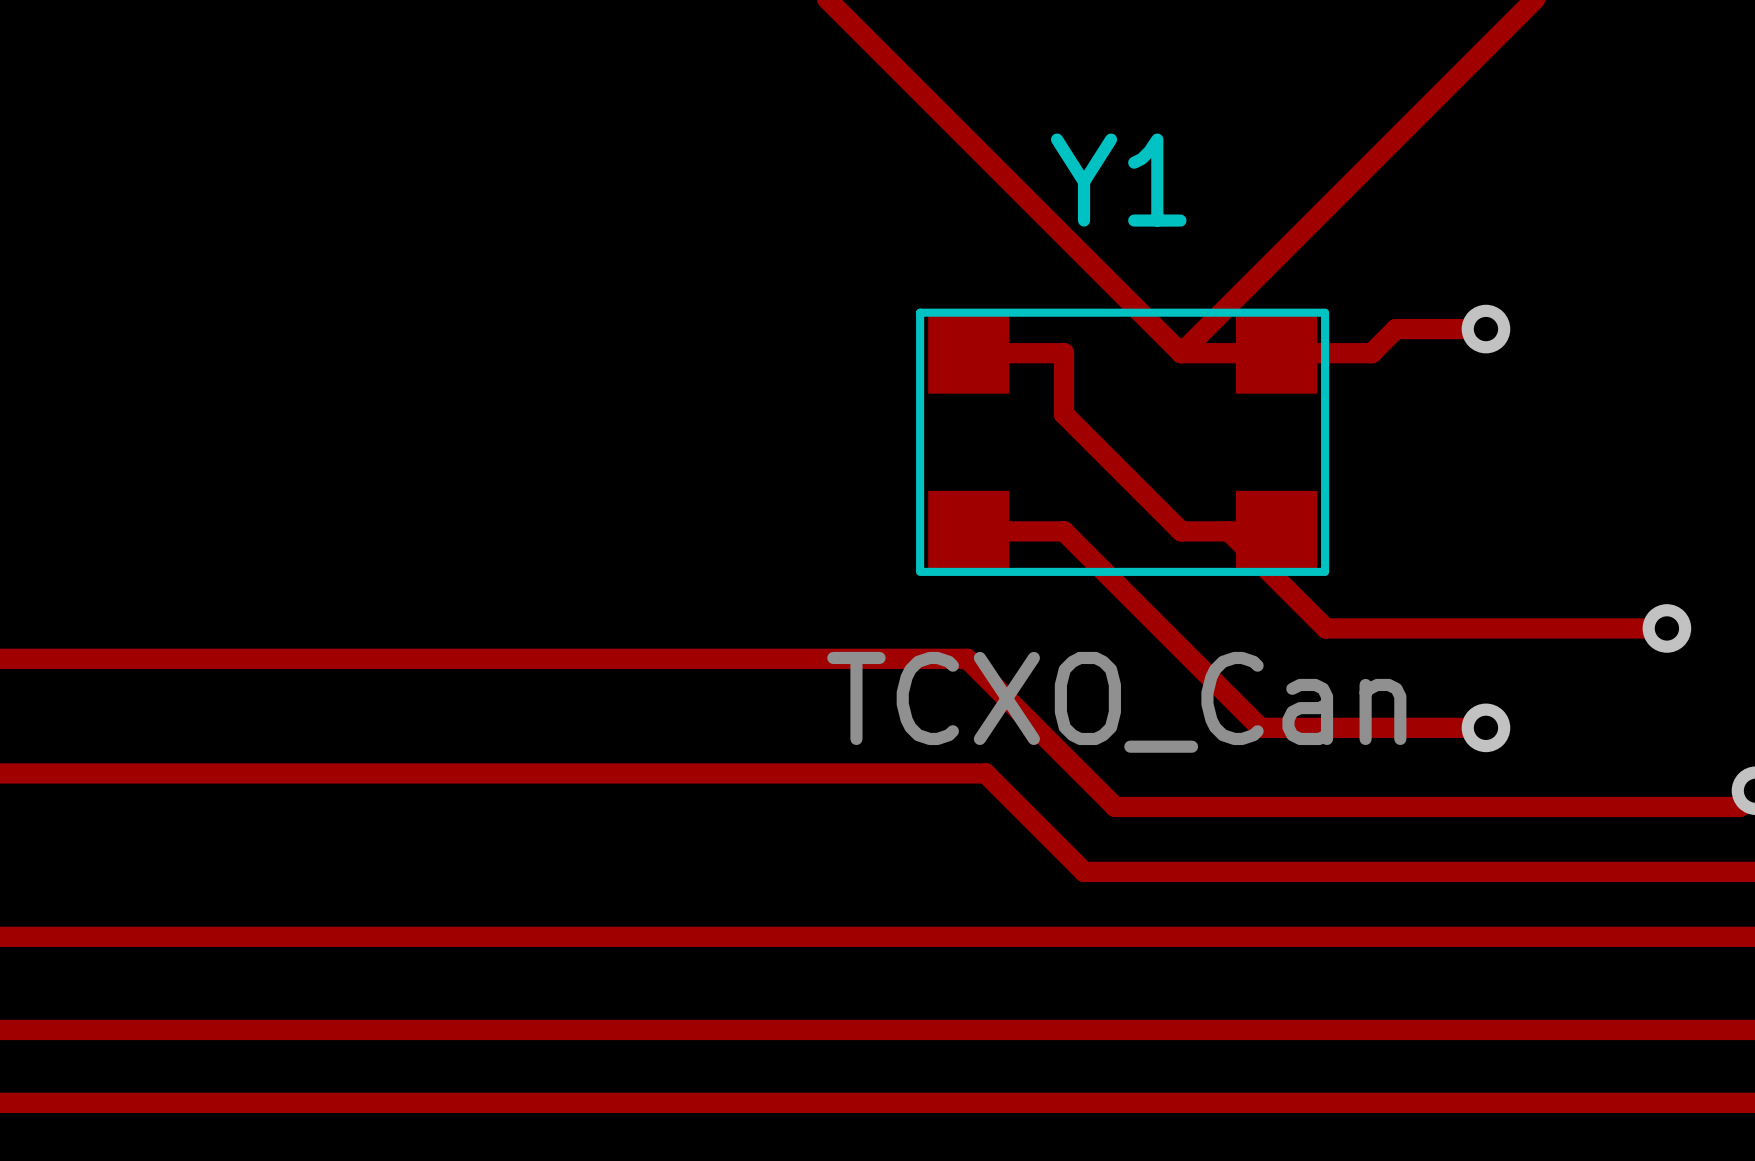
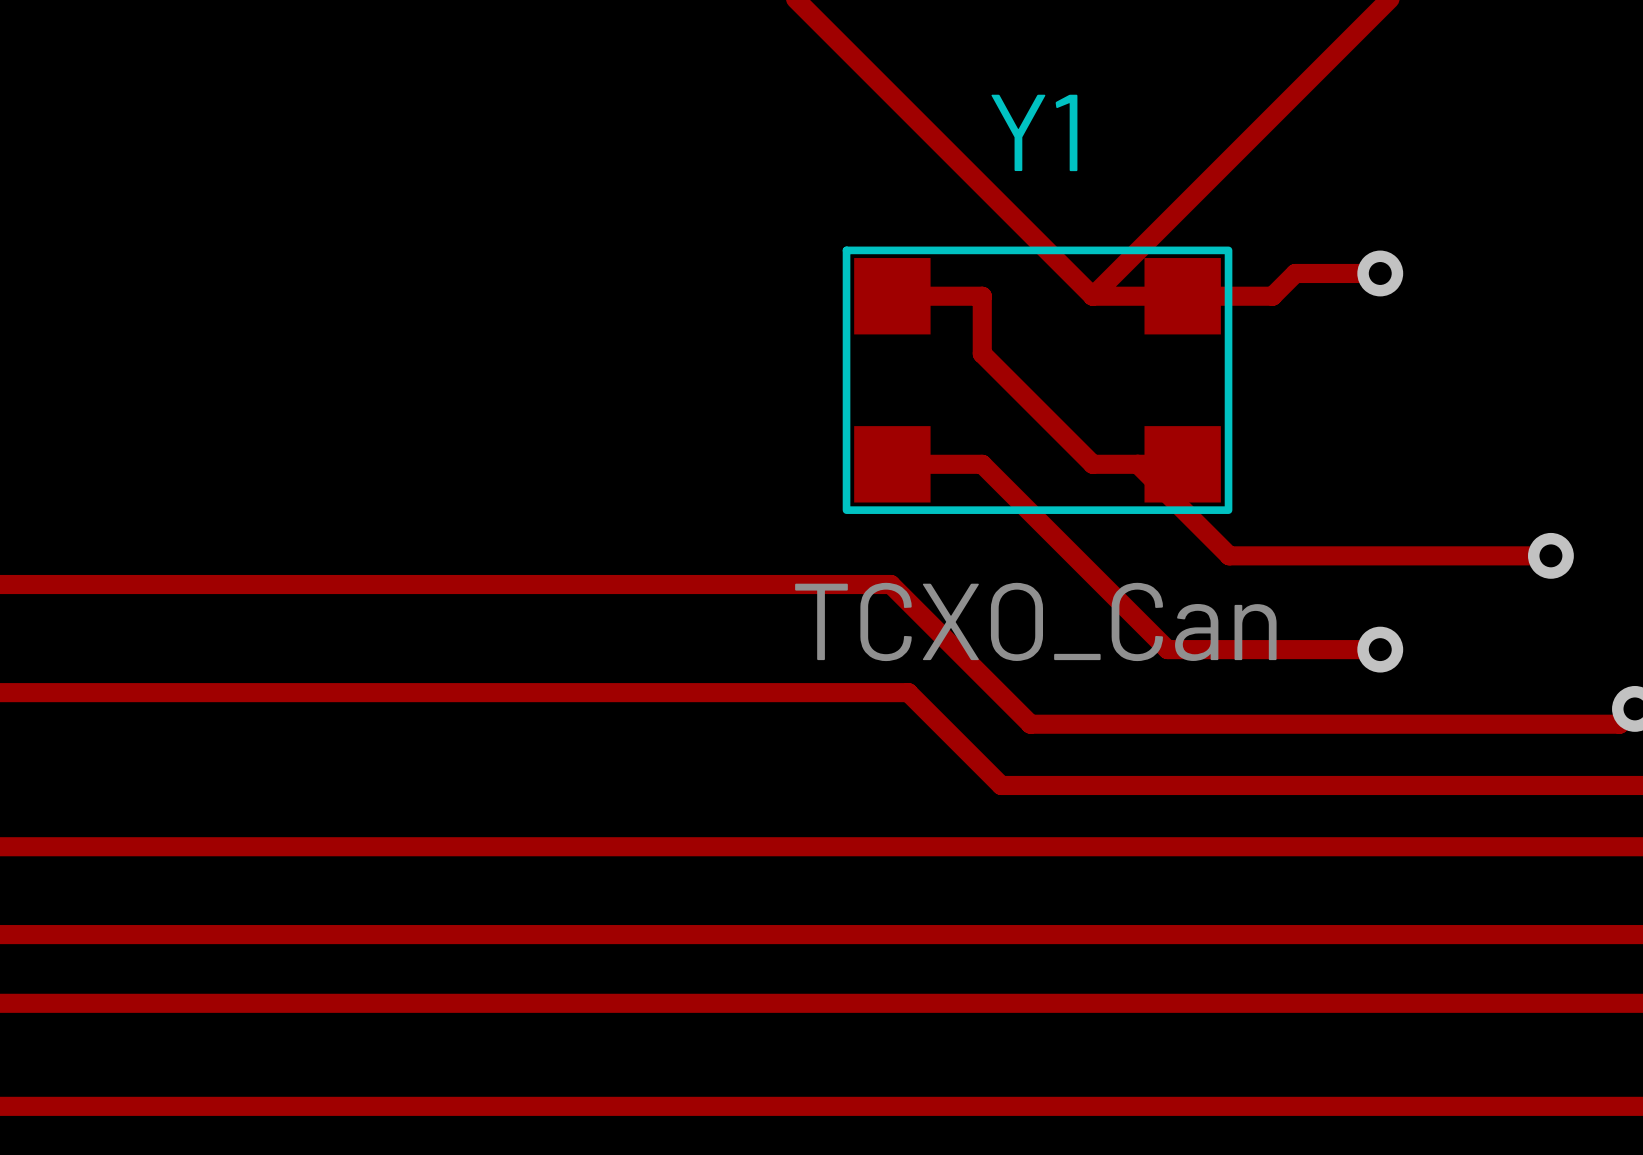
Y1 footprint: [916, 308, 1330, 576] -> [842, 246, 1233, 514]

